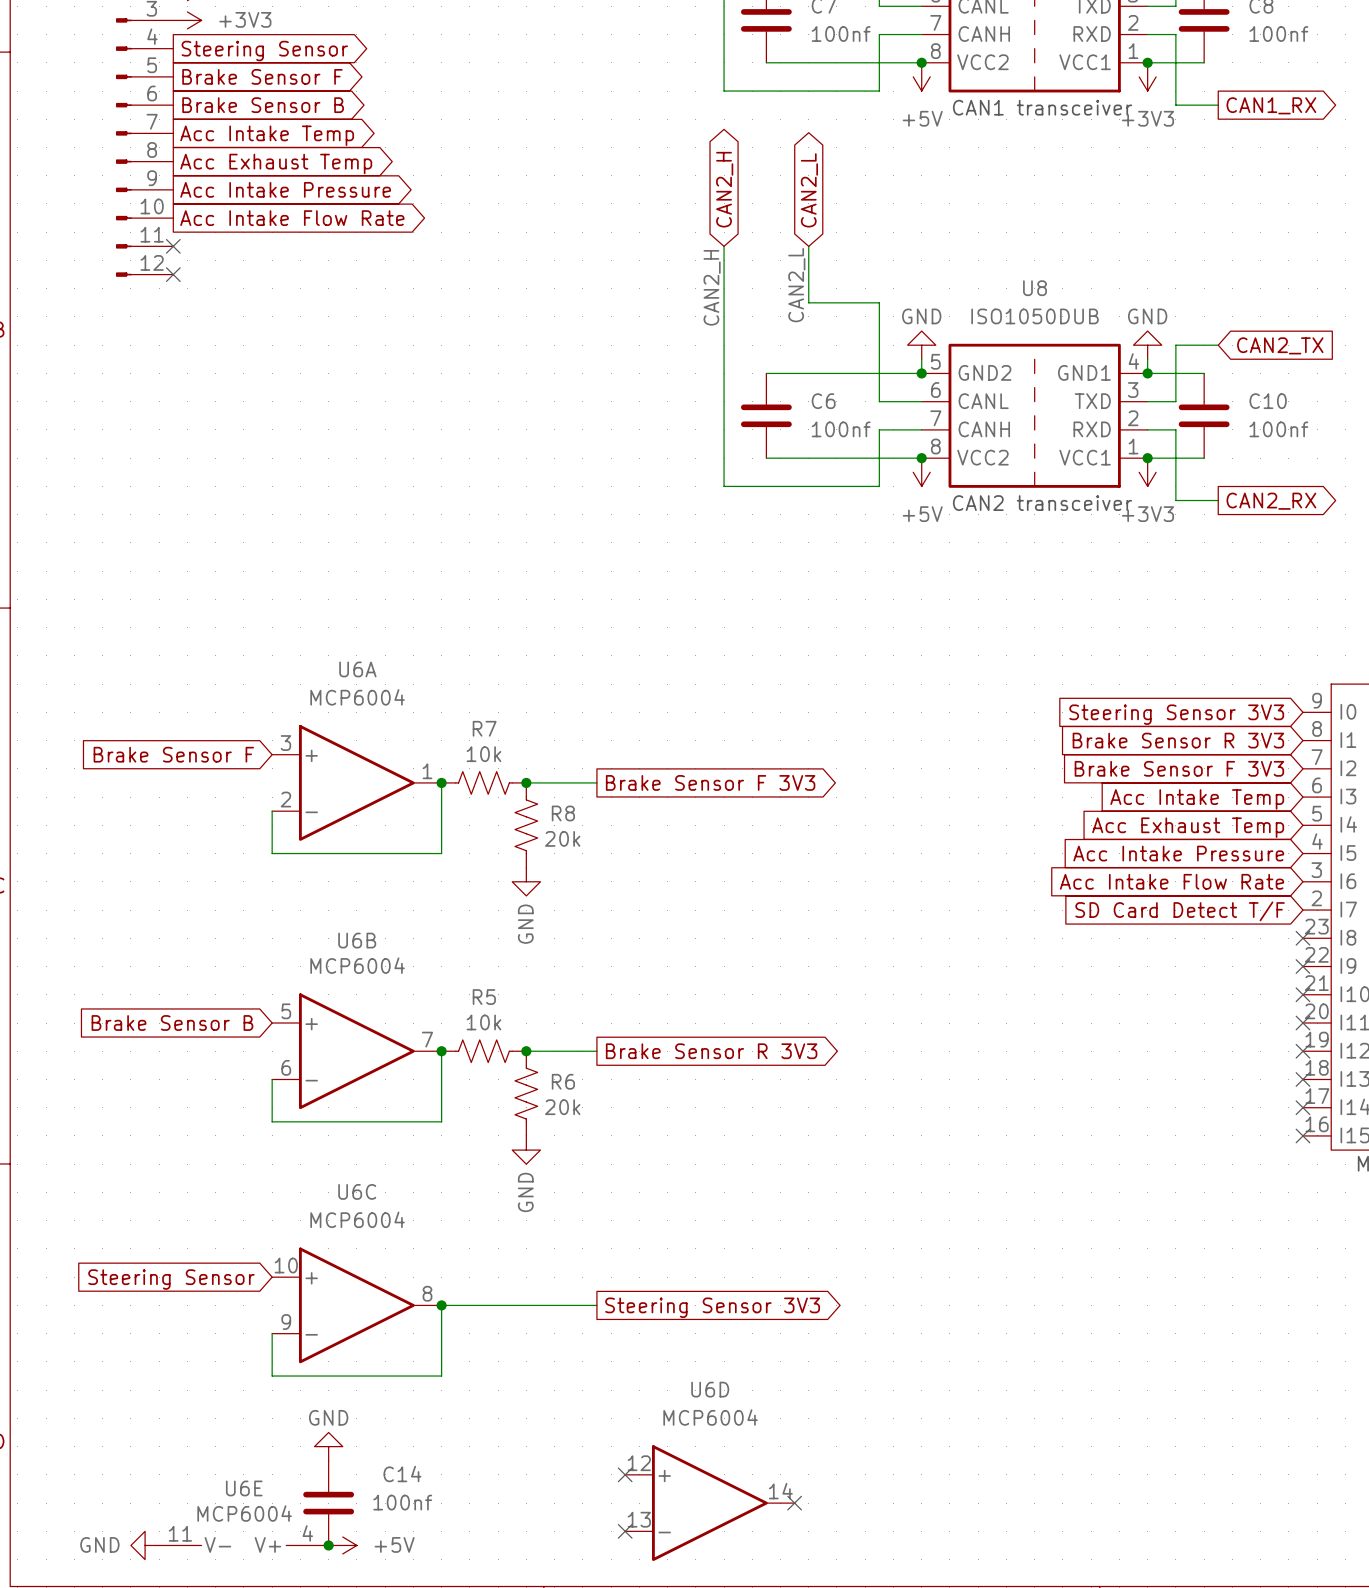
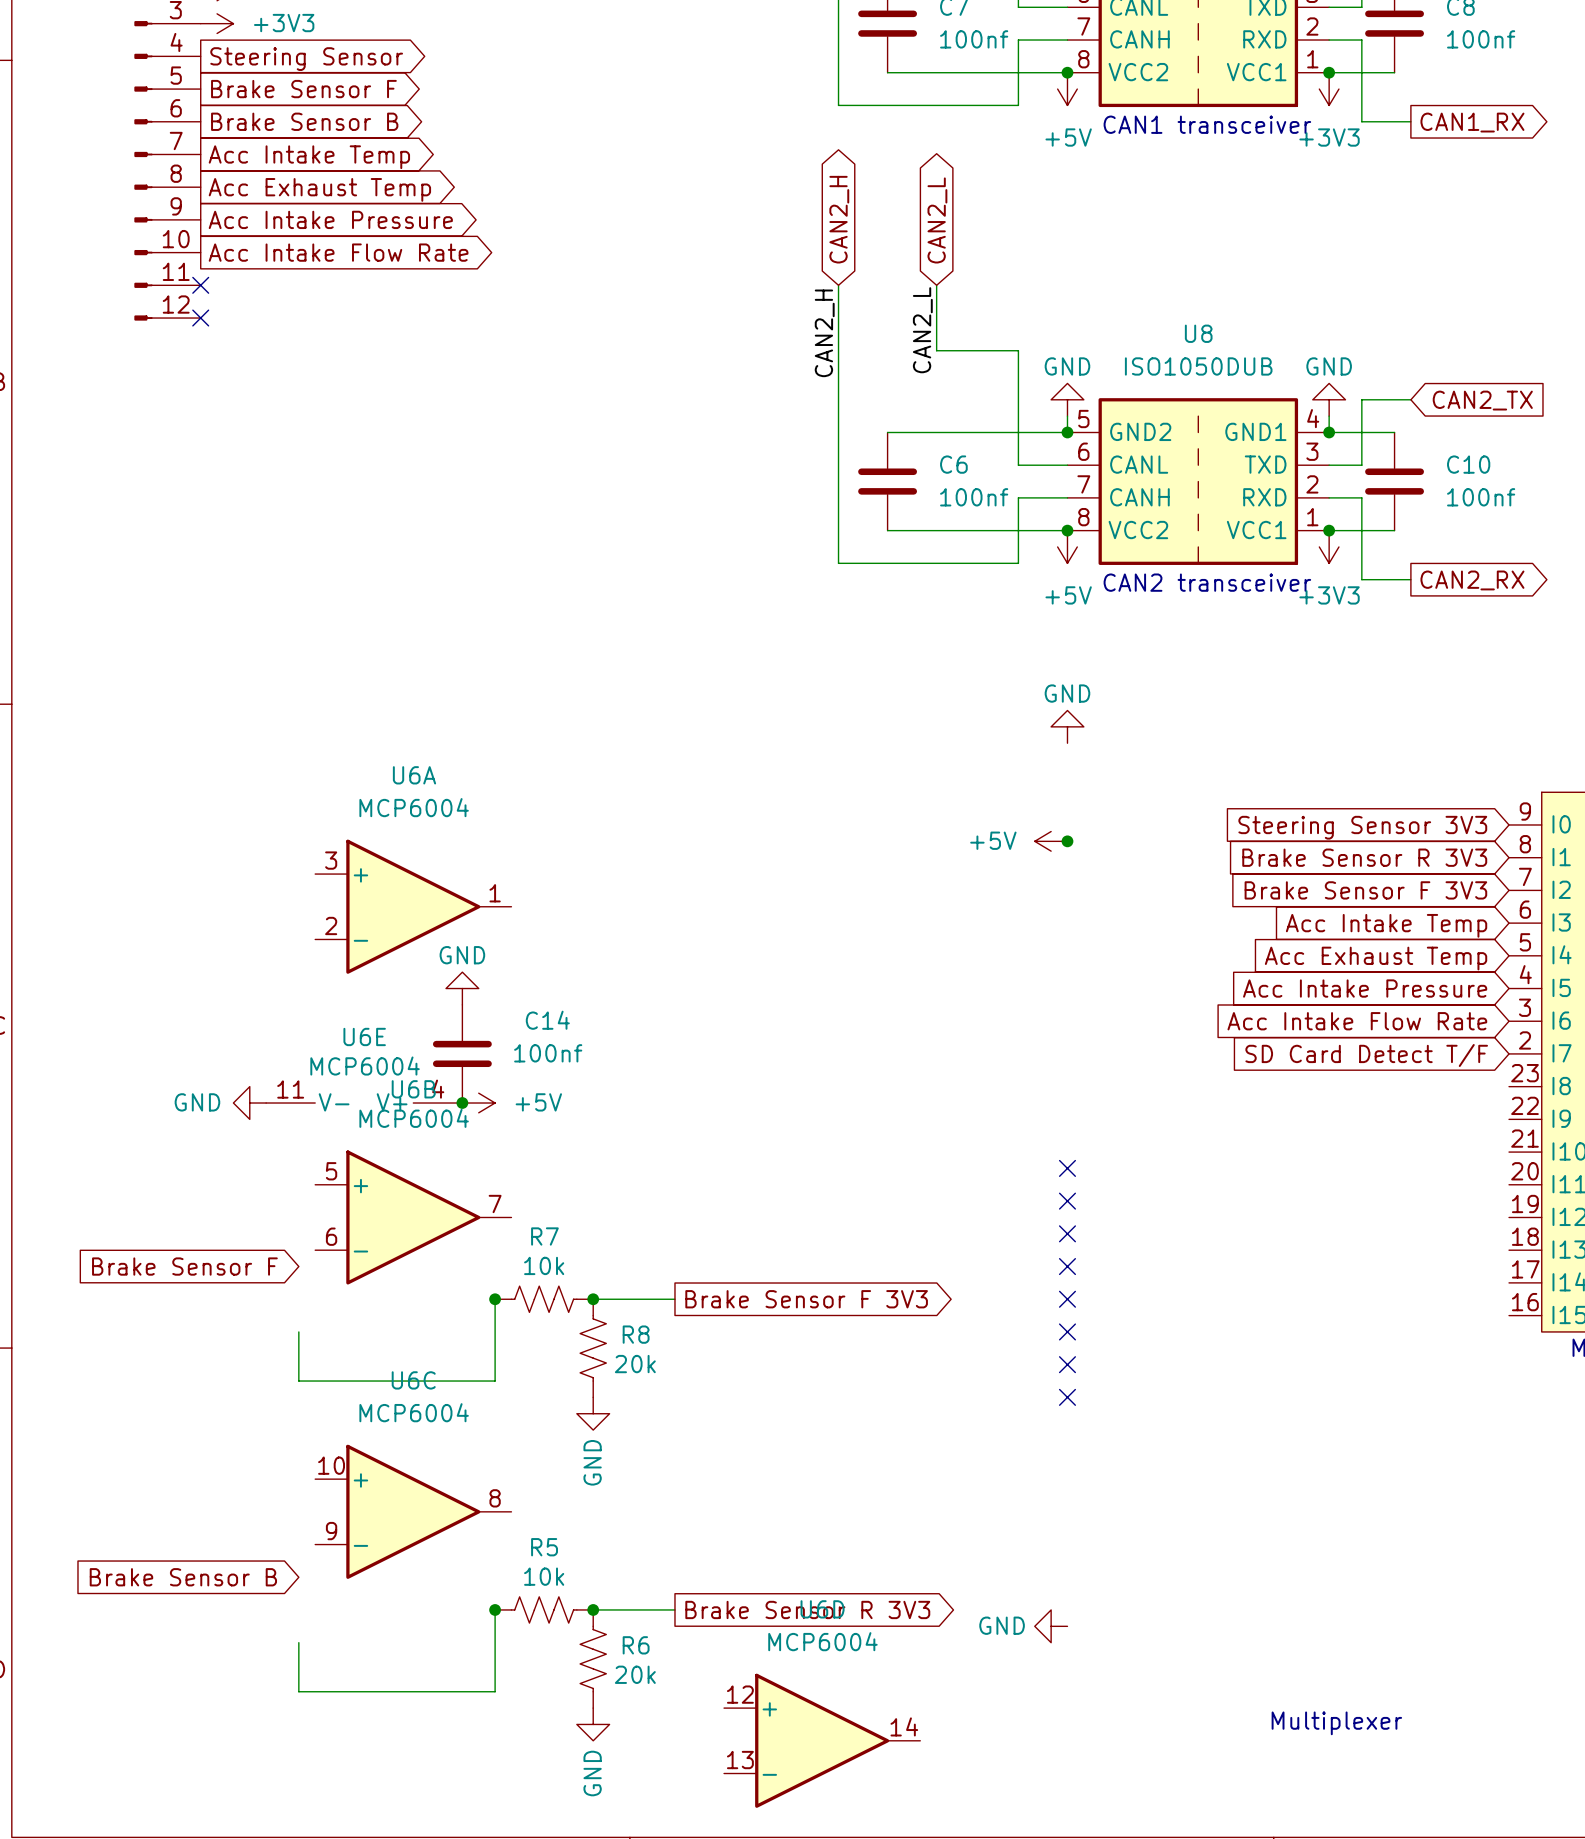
power symbol: none -> GND (1067, 726)
power symbol: none -> +5V (1051, 841)
junction: none -> (1067, 841)
global label: Brake Sensor F (173, 754) -> none
wire: (441, 782) (441, 853) (272, 853) (272, 811) -> none
junction: (441, 782) -> none
R7 position: (483, 782) -> (544, 1299)
wire: (526, 782) (596, 782) -> none
junction: (526, 782) -> none
global label: Brake Sensor F 3V3 (710, 782) -> none
R8 position: (526, 825) -> (593, 1348)
power symbol rotation: 0° (526, 881) -> 180° (462, 988)
power symbol position: GND (526, 881) -> GND (462, 988)
no-connect mark: (1302, 938) -> none
power symbol: none -> GND (249, 1103)
junction: none -> (462, 1103)
power symbol: none -> +5V (478, 1103)
no-connect mark: (1302, 966) -> none
no-connect mark: (1302, 994) -> none
no-connect mark: none -> (1067, 1168)
global label: Brake Sensor B (172, 1023) -> none
no-connect mark: (1302, 1023) -> none
no-connect mark: none -> (1067, 1201)
wire: (441, 1051) (441, 1121) (272, 1121) (272, 1079) -> (495, 1299) (495, 1381) (298, 1381) (298, 1331)
junction: (441, 1051) -> none
R5 position: (483, 1051) -> (544, 1609)
wire: (526, 1051) (596, 1051) -> (593, 1299) (674, 1299)
junction: (526, 1051) -> none
global label: Brake Sensor R 3V3 (711, 1051) -> none
no-connect mark: (1302, 1051) -> none
no-connect mark: none -> (1067, 1233)
no-connect mark: (1302, 1079) -> none
global label: none -> Brake Sensor F (184, 1266)
R6 position: (526, 1093) -> (593, 1659)
no-connect mark: none -> (1067, 1266)
no-connect mark: (1302, 1107) -> none
junction: none -> (495, 1299)
junction: none -> (593, 1299)
global label: none -> Brake Sensor F 3V3 (806, 1299)
no-connect mark: none -> (1067, 1299)
no-connect mark: (1302, 1135) -> none
power symbol position: GND (526, 1150) -> GND (593, 1413)
no-connect mark: none -> (1067, 1331)
no-connect mark: none -> (1067, 1364)
no-connect mark: none -> (1067, 1397)
global label: Steering Sensor (171, 1279) -> none
junction: (441, 1305) -> none
wire: (596, 1305) (441, 1305) (441, 1376) (272, 1376) (272, 1333) -> none
global label: Steering Sensor 3V3 (712, 1307) -> none
global label: none -> Brake Sensor B (183, 1577)
wire: none -> (495, 1609) (495, 1691) (298, 1691) (298, 1642)
junction: none -> (495, 1609)
wire: none -> (593, 1609) (674, 1609)
junction: none -> (593, 1609)
global label: none -> Brake Sensor R 3V3 (807, 1609)
power symbol: none -> GND (1051, 1626)
power symbol: GND (328, 1446) -> none
no-connect mark: (625, 1474) -> none
power symbol: none -> GND (593, 1724)
text: none -> Multiplexer (1336, 1723)
C14 position: (328, 1503) -> (462, 1053)
no-connect mark: (794, 1503) -> none
no-connect mark: (625, 1531) -> none
power symbol: GND (145, 1545) -> none
U6E position: (243, 1545) -> (364, 1103)
junction: (328, 1545) -> none
power symbol: +5V (342, 1545) -> none

